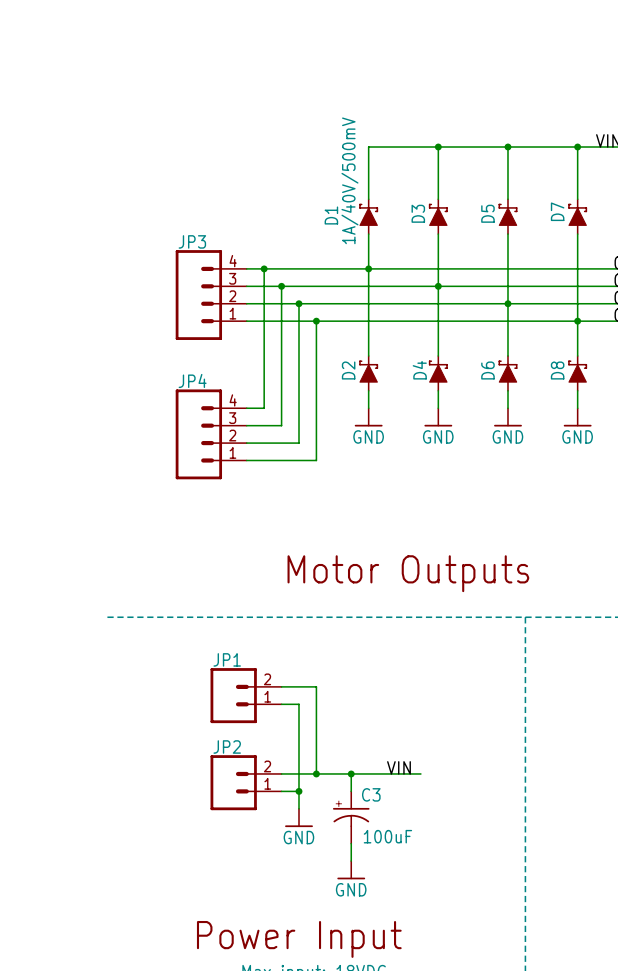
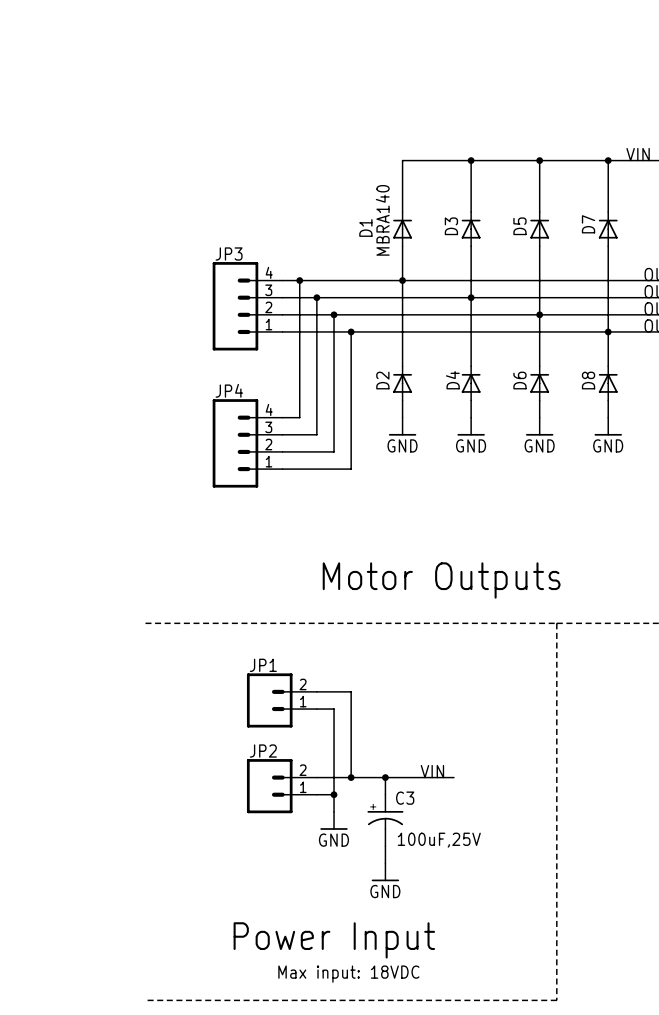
D1 value: 1A/40V/500mV (349, 180) -> MBRA140 (382, 220)
D1 symbol: [359, 198, 378, 235] -> [393, 212, 412, 247]
D3 symbol: [429, 198, 448, 235] -> [461, 212, 481, 247]
D5 symbol: [498, 198, 518, 235] -> [530, 212, 550, 247]
D7 symbol: [568, 198, 587, 235] -> [598, 212, 618, 247]
D2 symbol: [359, 355, 378, 392] -> [393, 366, 412, 401]
D4 symbol: [429, 355, 448, 392] -> [461, 366, 481, 401]
D6 symbol: [498, 355, 518, 392] -> [530, 366, 550, 401]
D8 symbol: [568, 355, 587, 392] -> [598, 366, 618, 401]
C3 value: 100uF (387, 836) -> 100uF,25V (439, 840)

